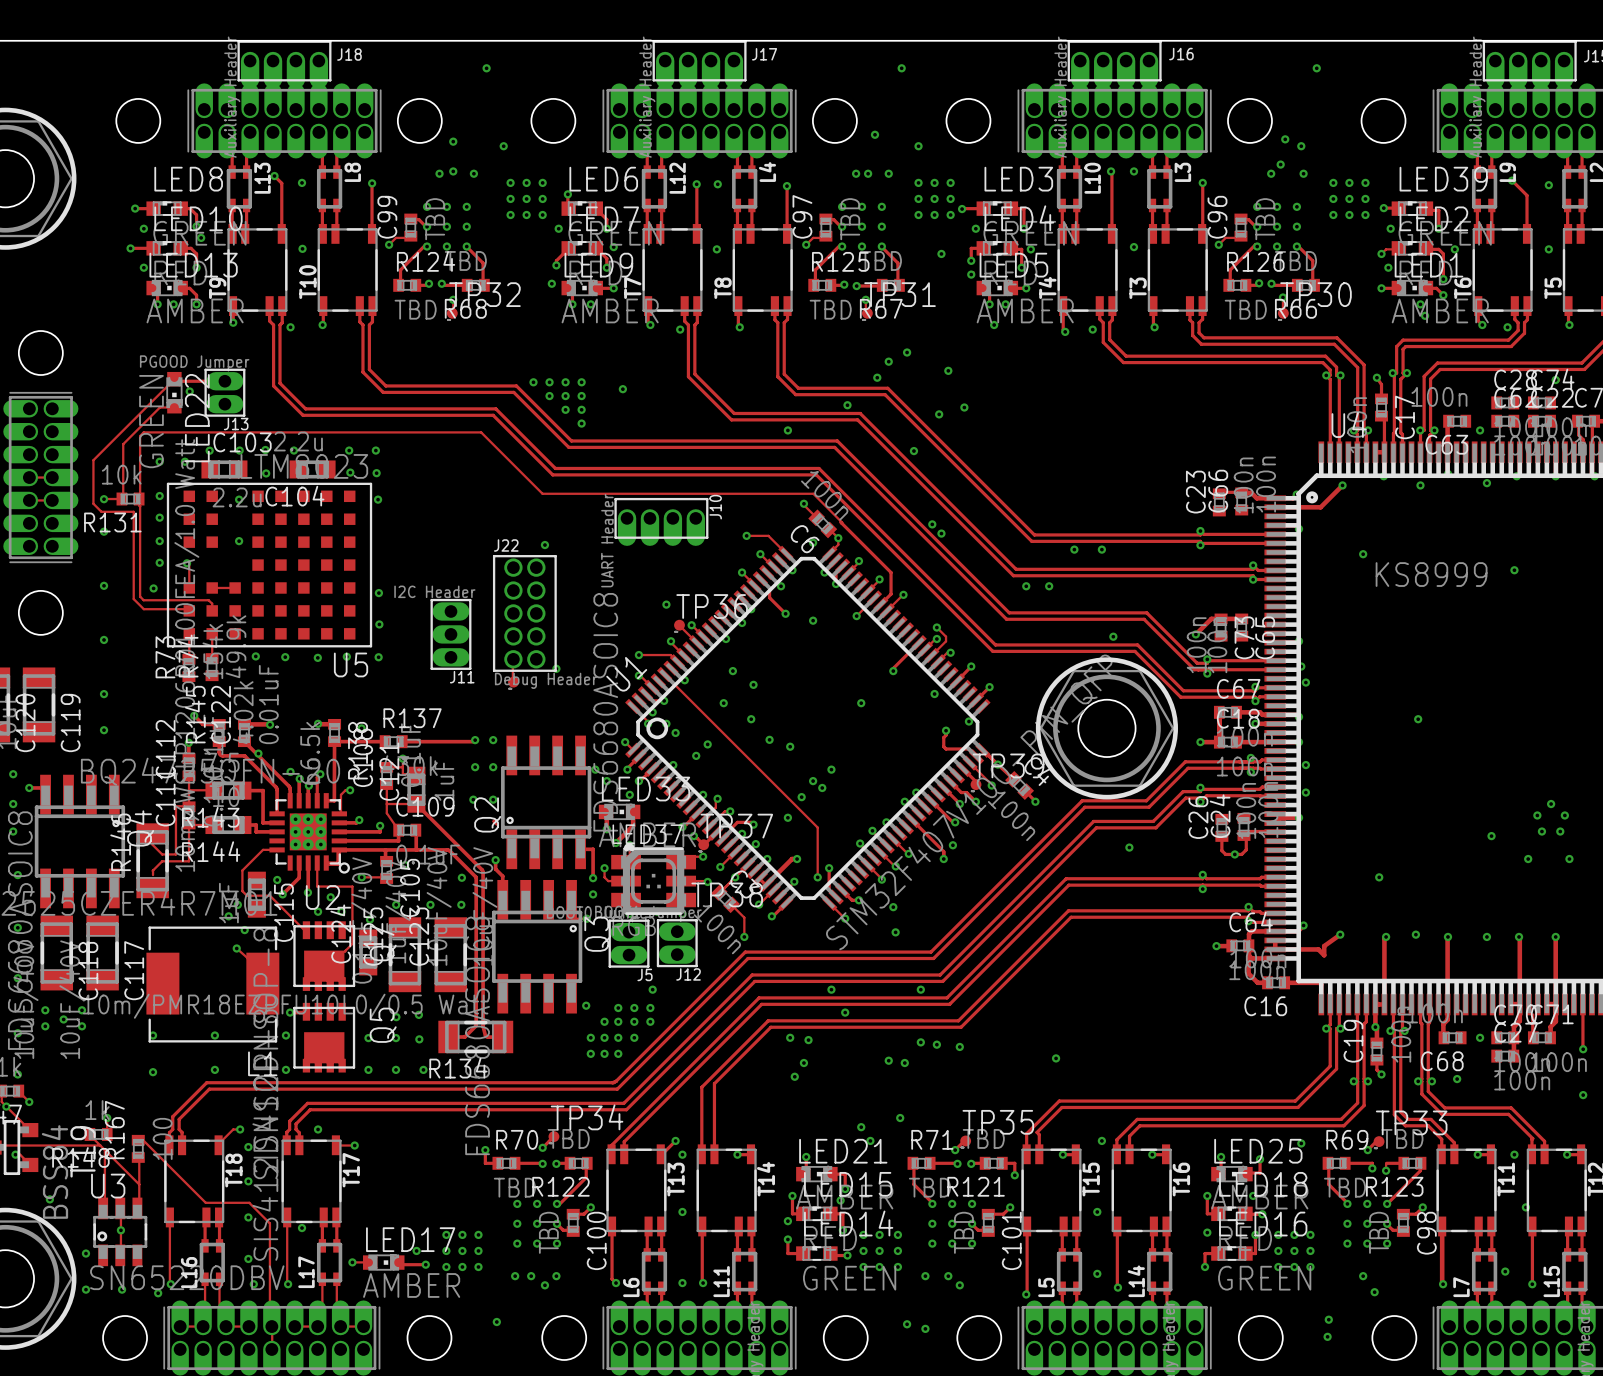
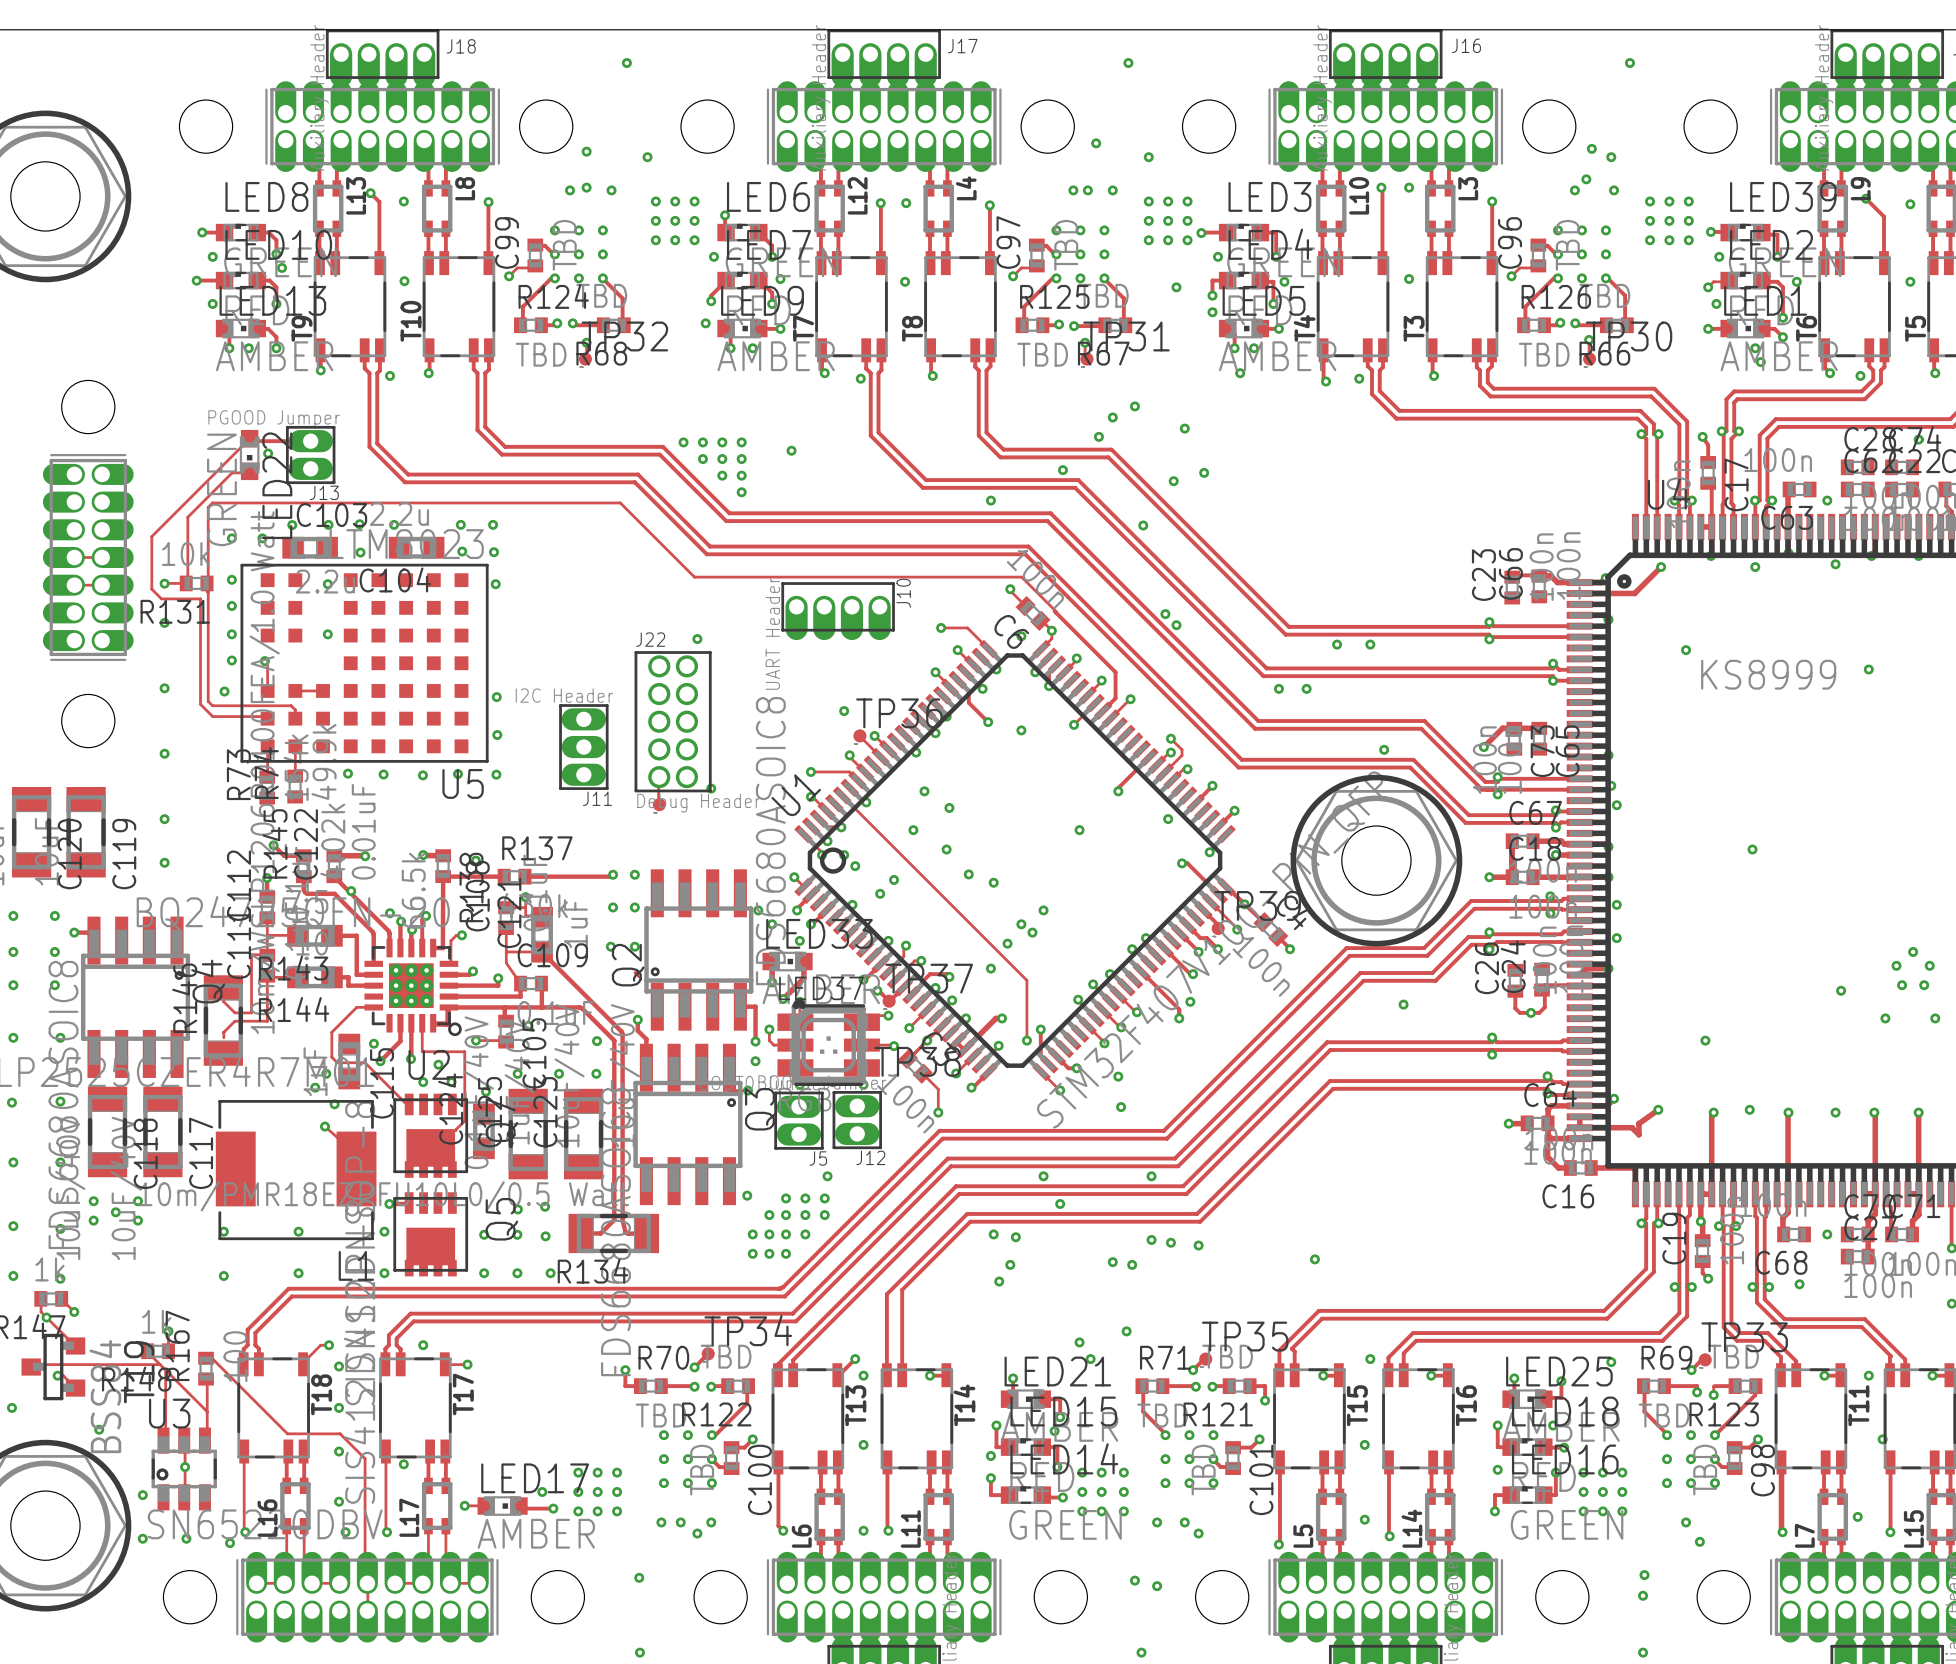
track: (946, 730) (943, 737) (943, 746) (946, 749) (968, 749) -> (1182, 863) (1187, 863) (1209, 885)

